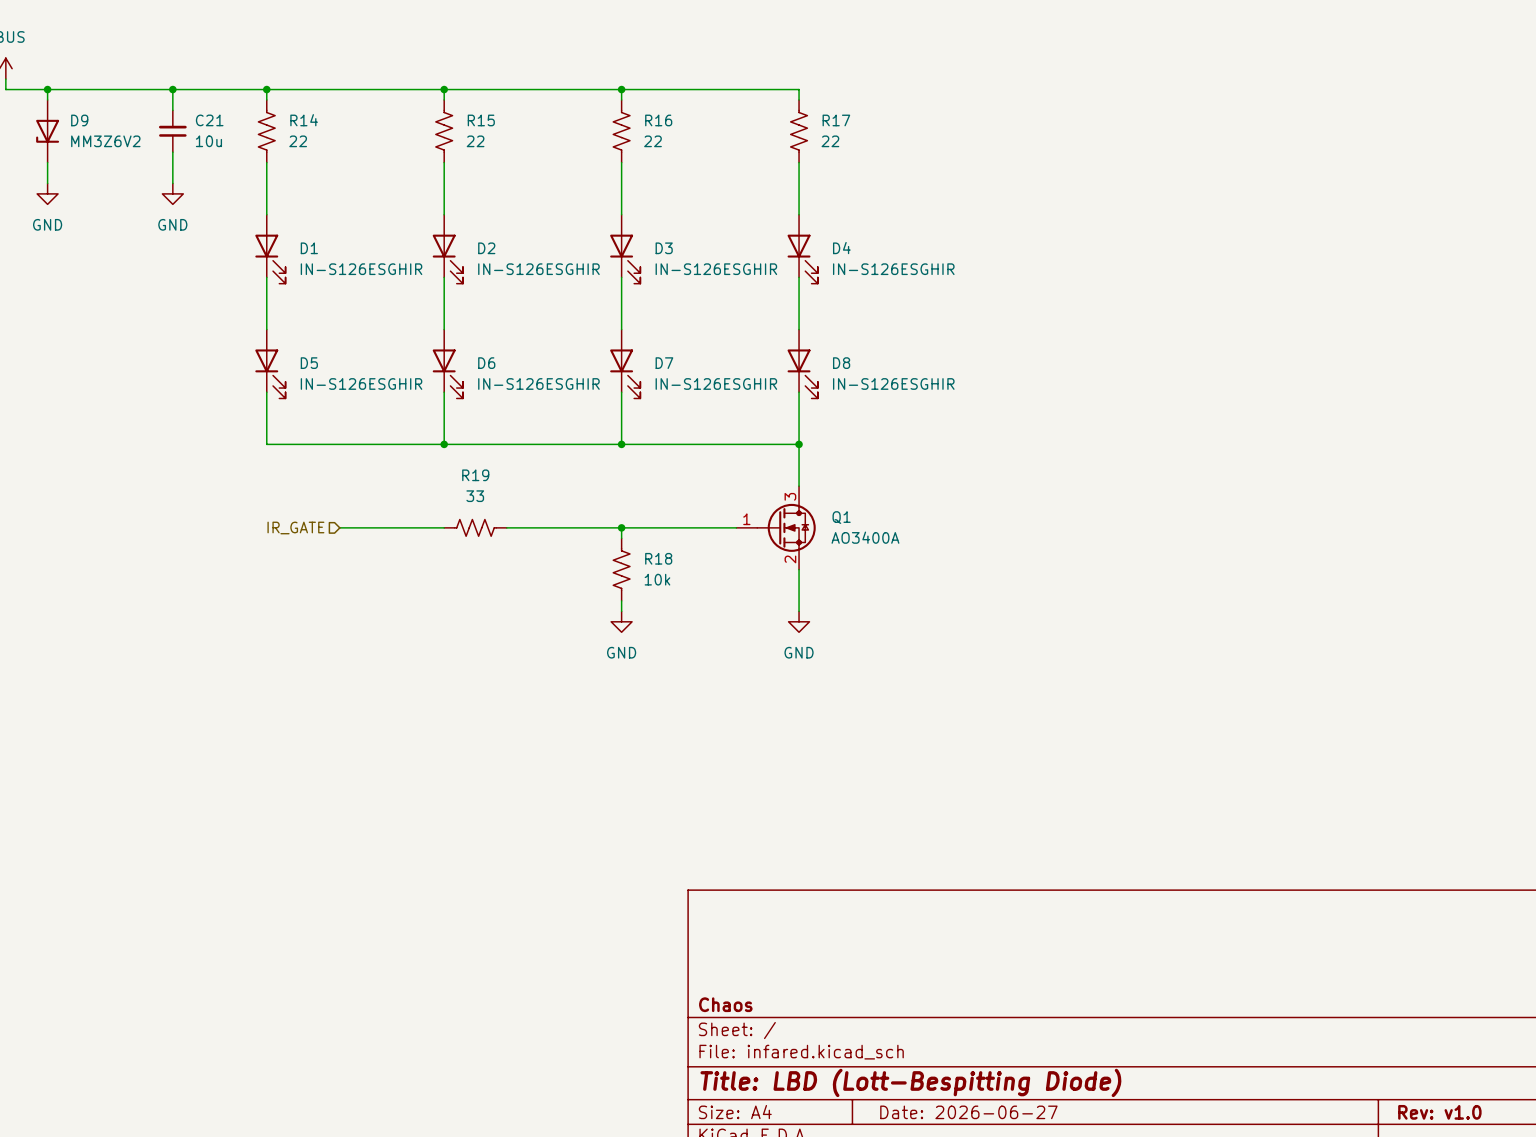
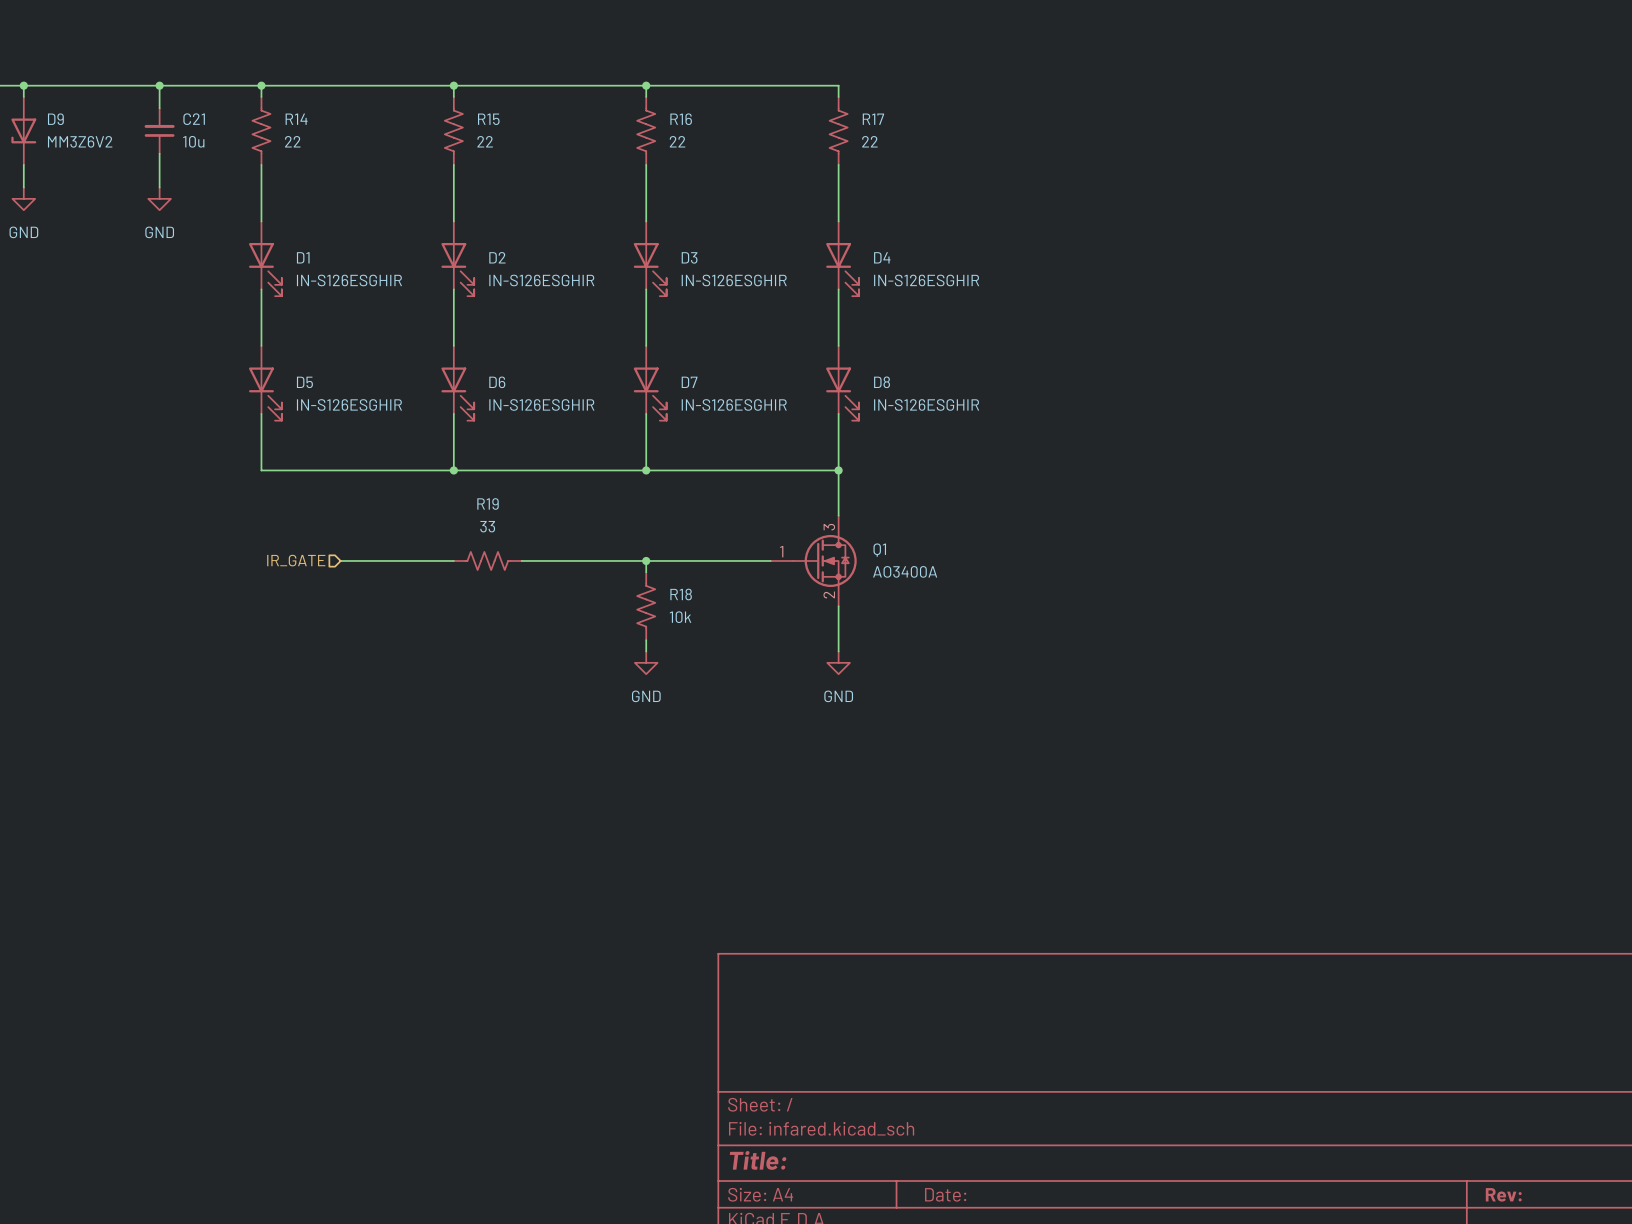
title block: Chaos (725, 1004) -> none
title block: Title: LBD (Lott-Bespitting Diode) (910, 1082) -> Title: (758, 1160)
title block: Date: 2026-06-27 (968, 1112) -> Date: (945, 1194)
title block: Rev: v1.0 (1439, 1112) -> Rev: (1503, 1194)

